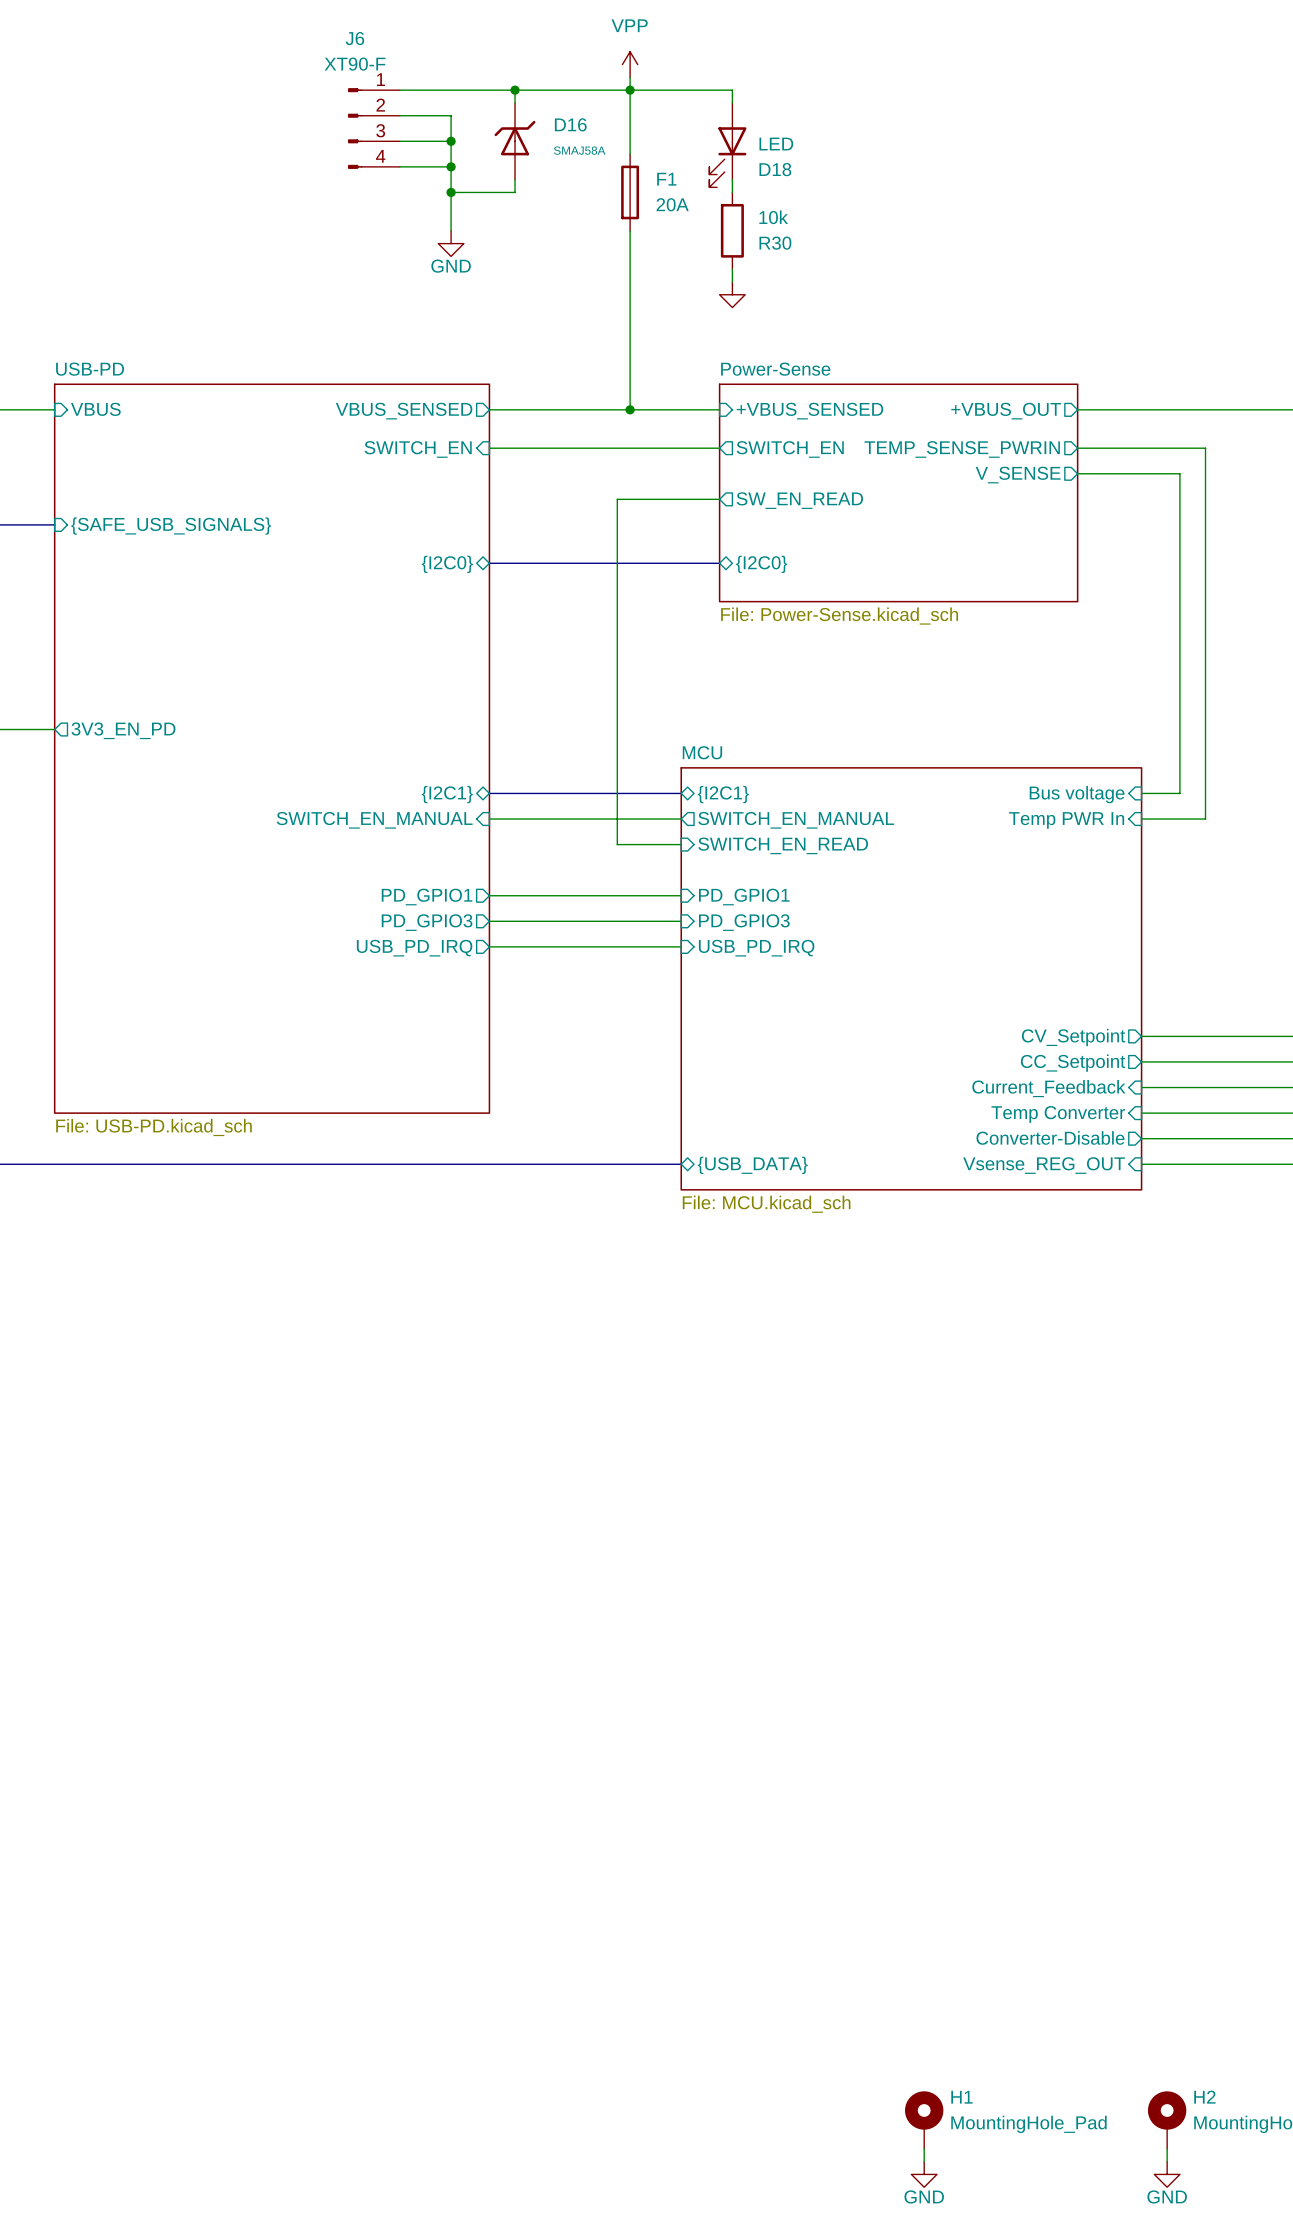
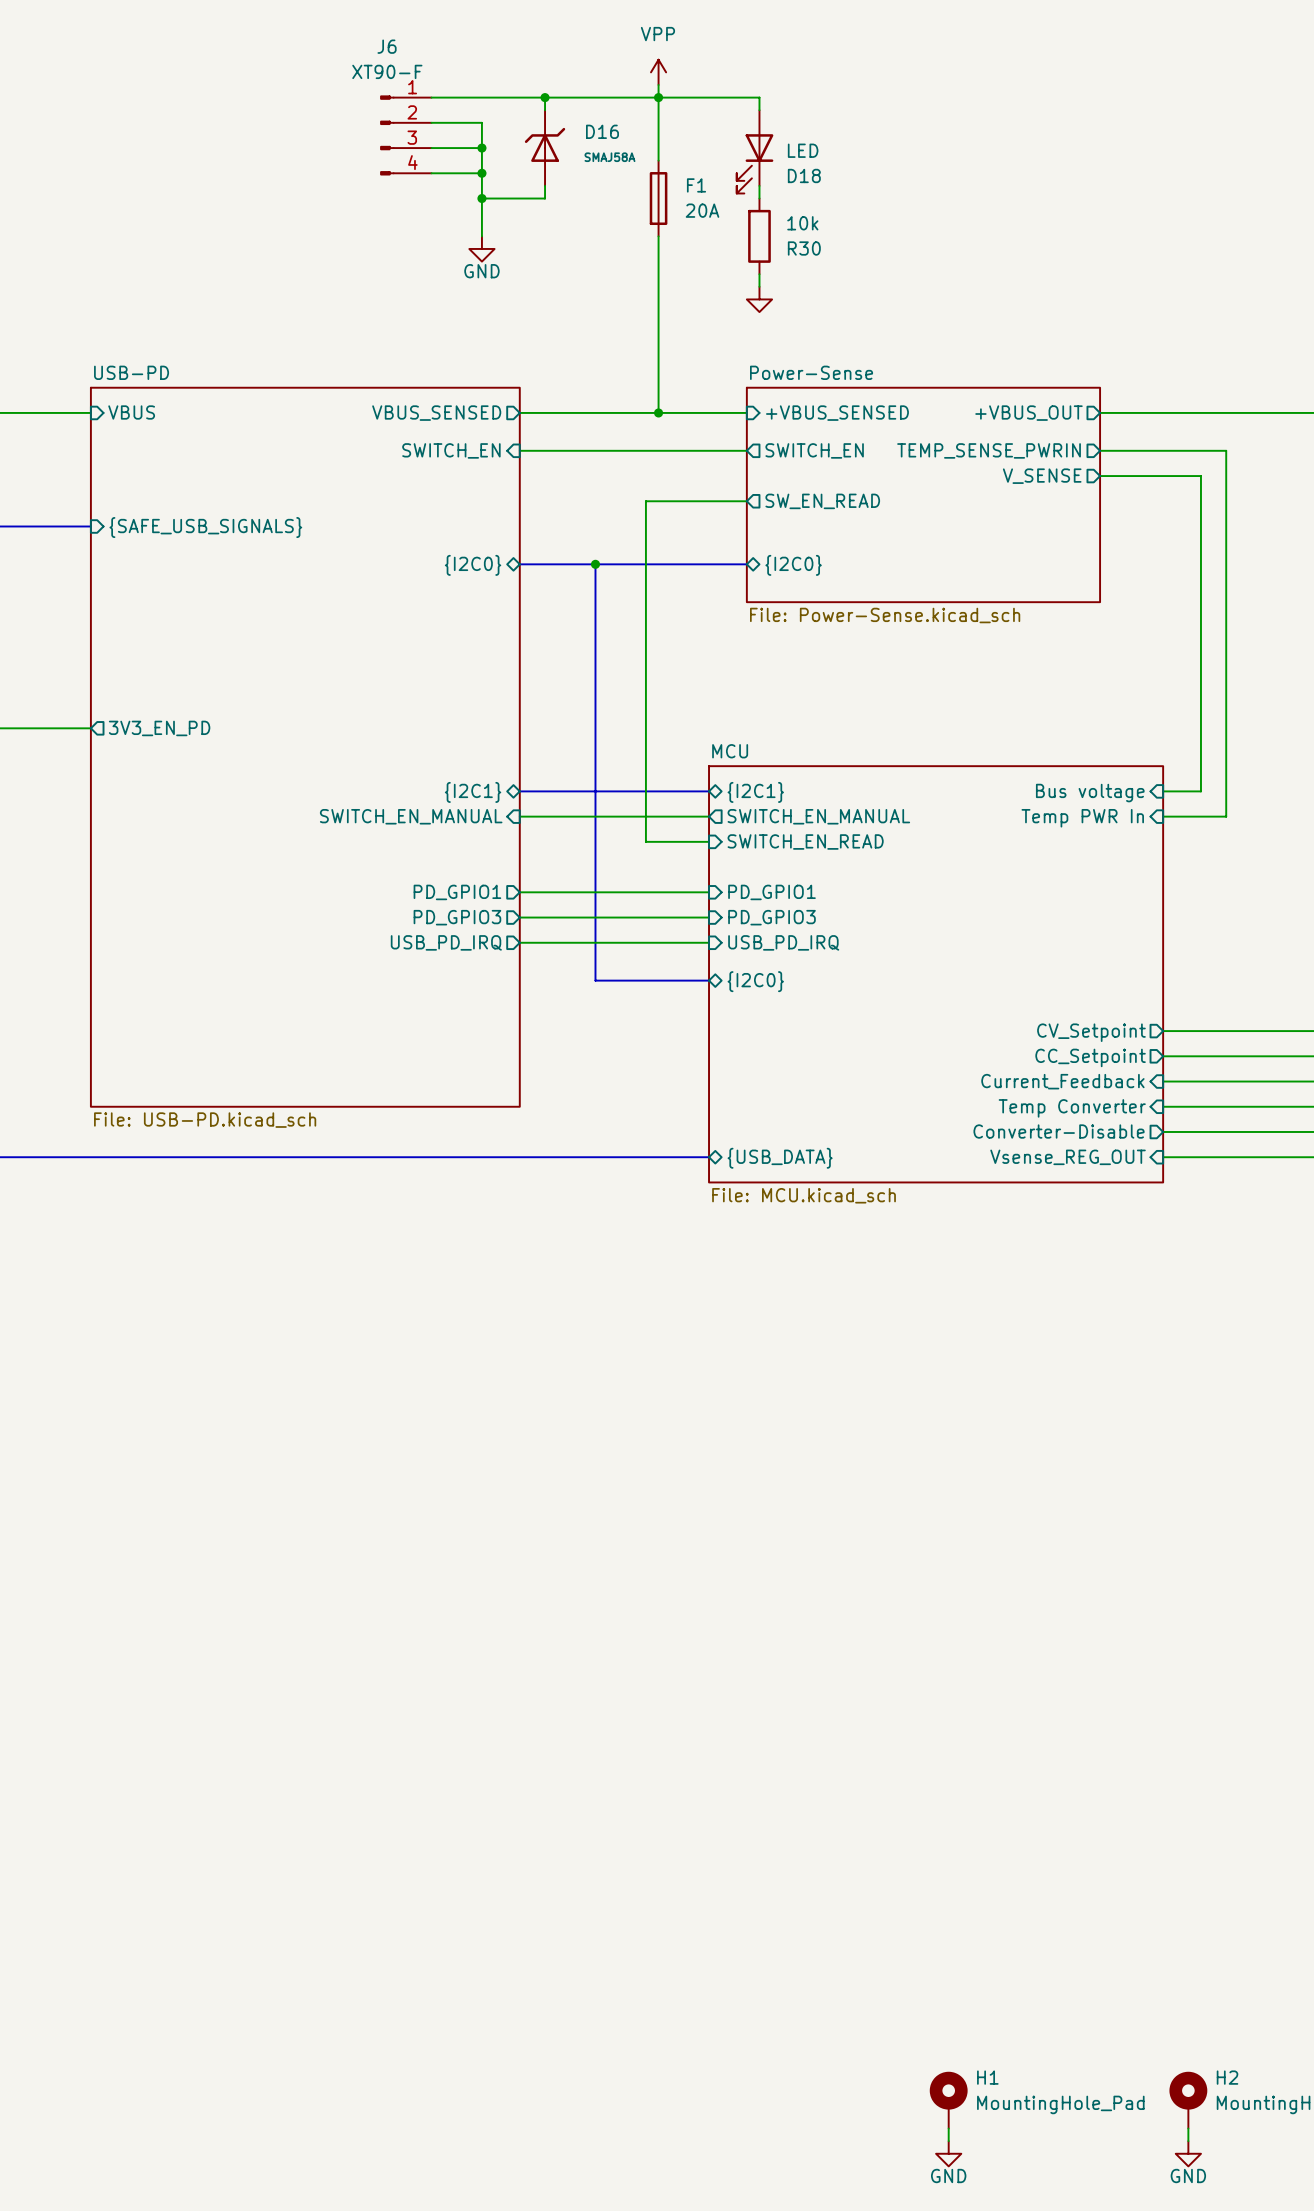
bus: none -> (595, 564) (595, 980) (709, 980)
junction: none -> (595, 564)
sheet pin: none -> {I2C0} (755, 981)

